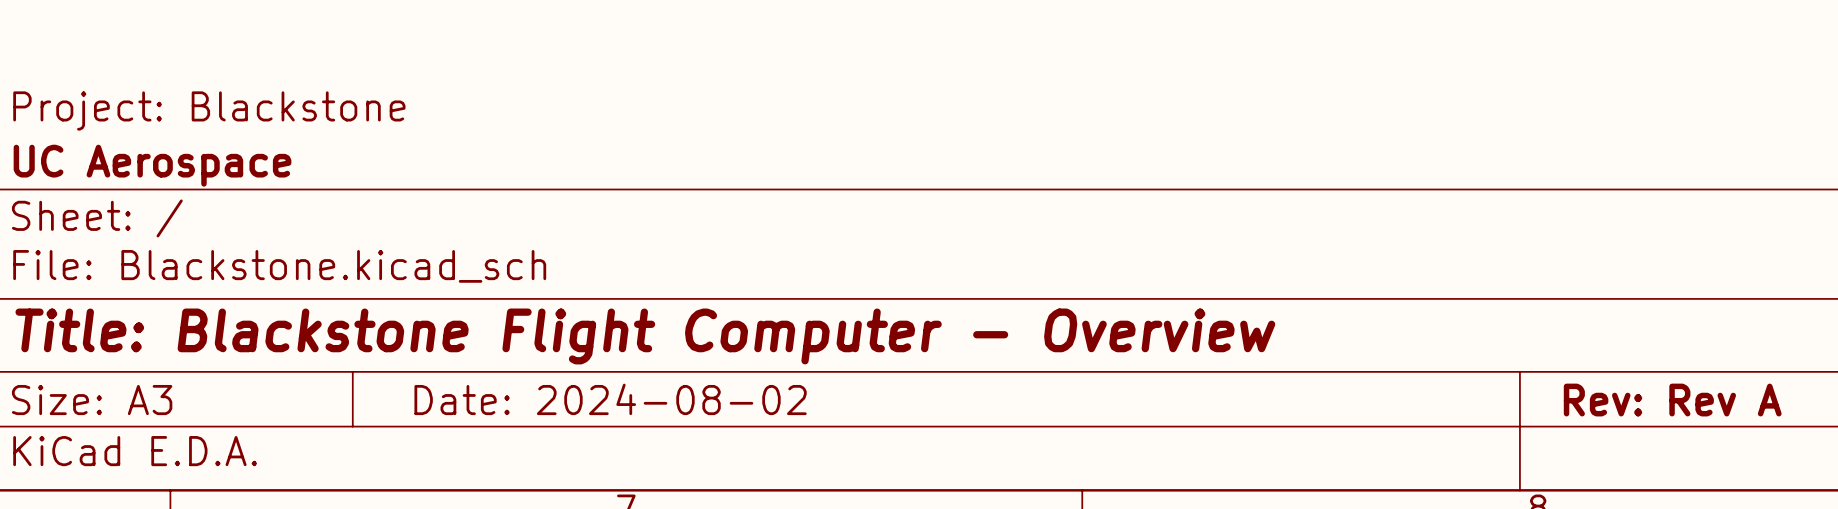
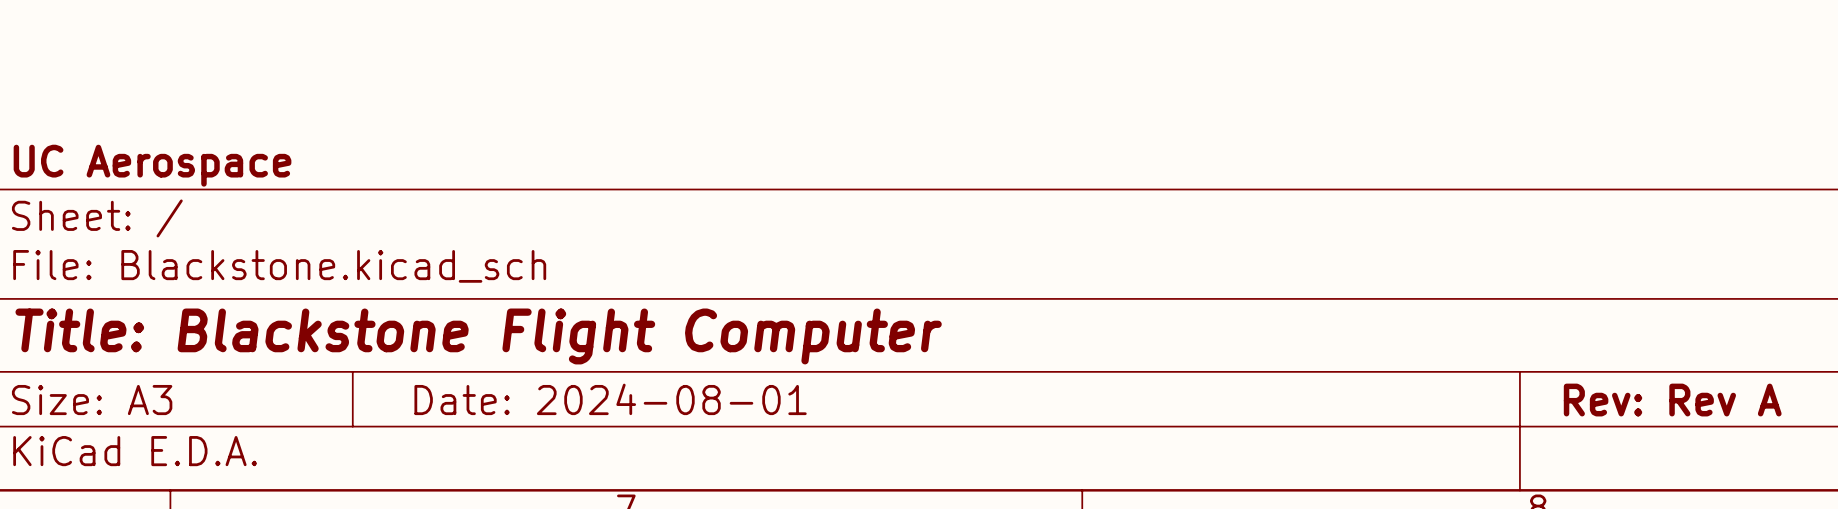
title block: Project: Blackstone (209, 110) -> none
title block: Title: Blackstone Flight Computer - Overview (645, 336) -> Title: Blackstone Flight Computer (478, 336)
title block: Date: 2024-08-02 (610, 399) -> Date: 2024-08-01 (610, 399)

